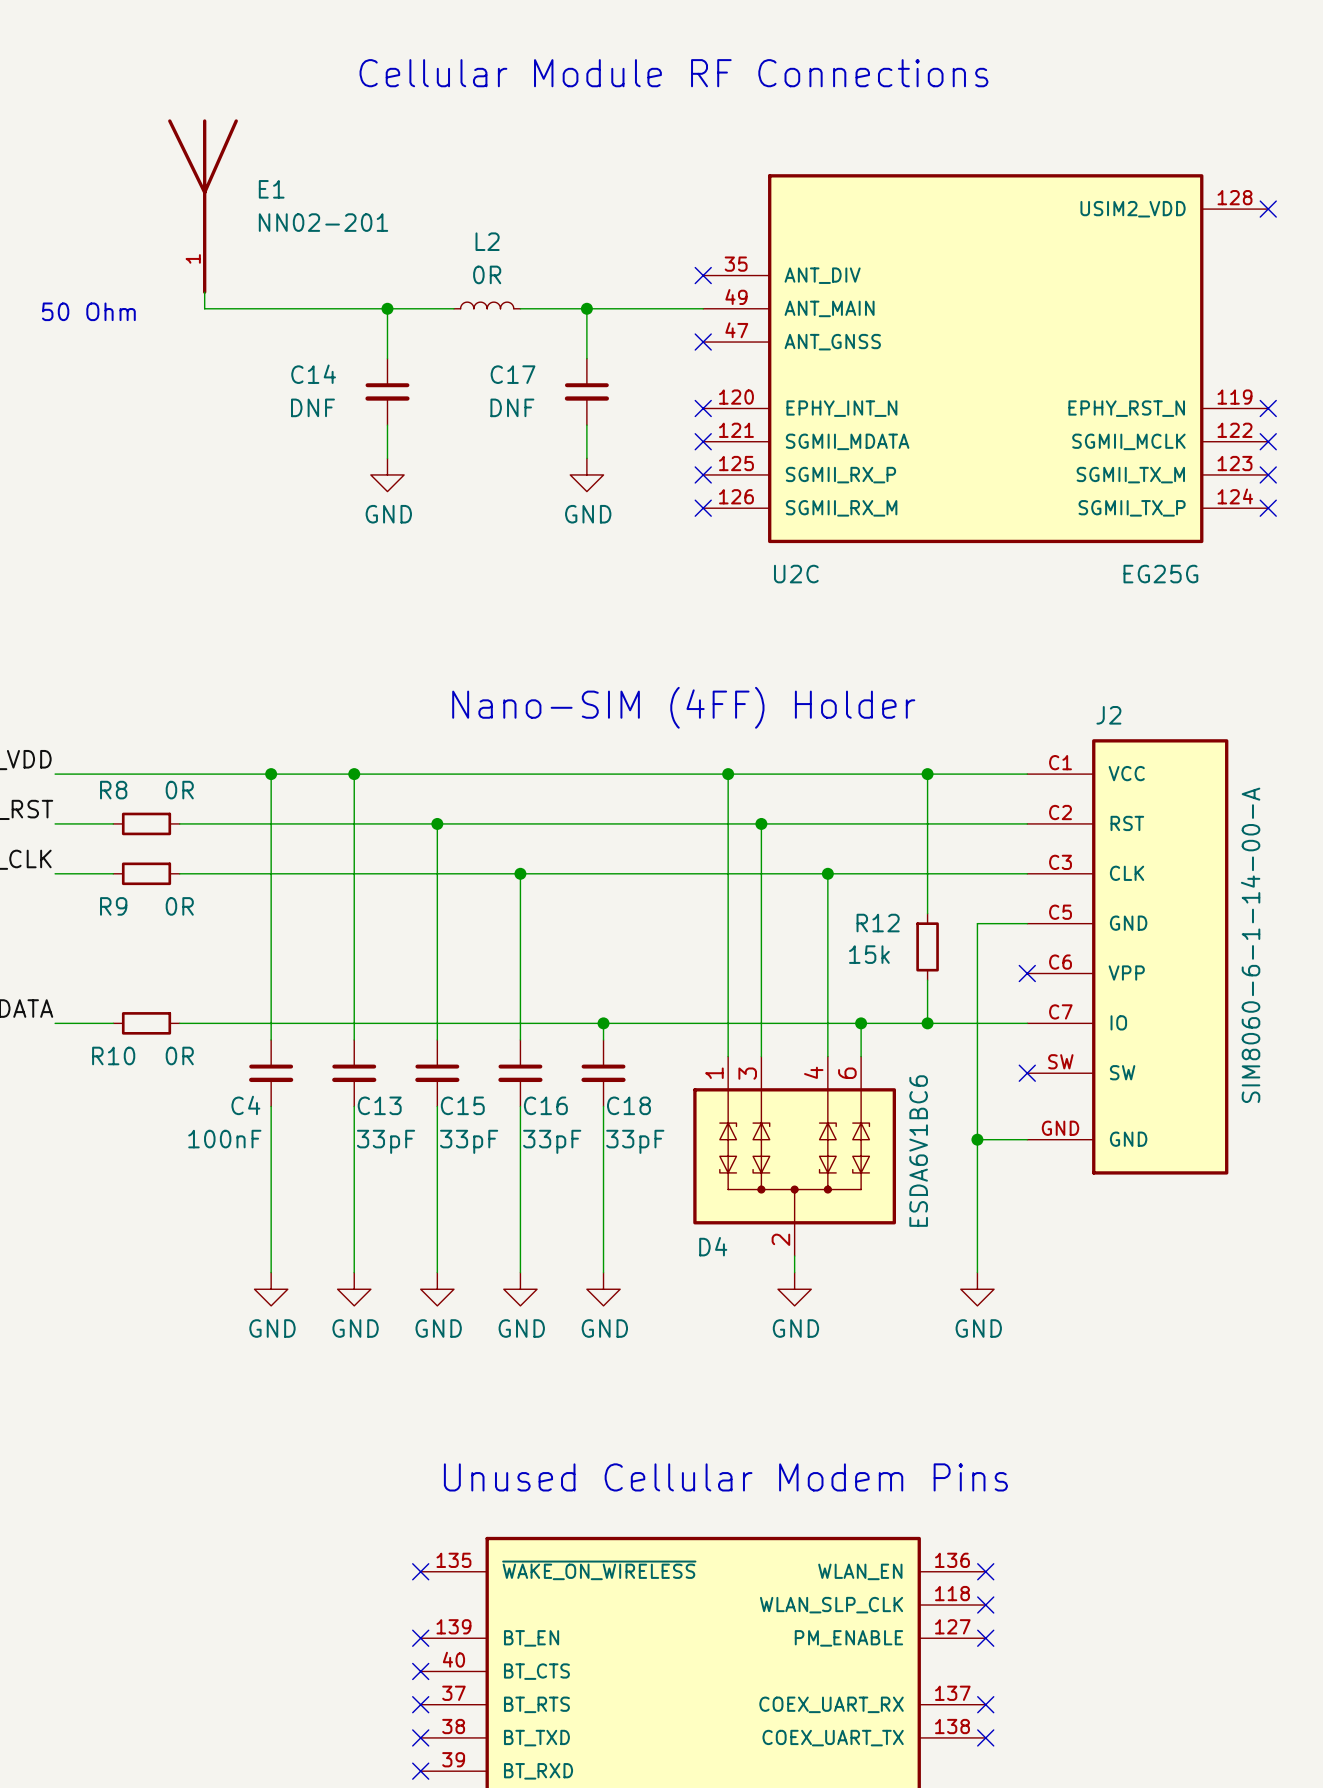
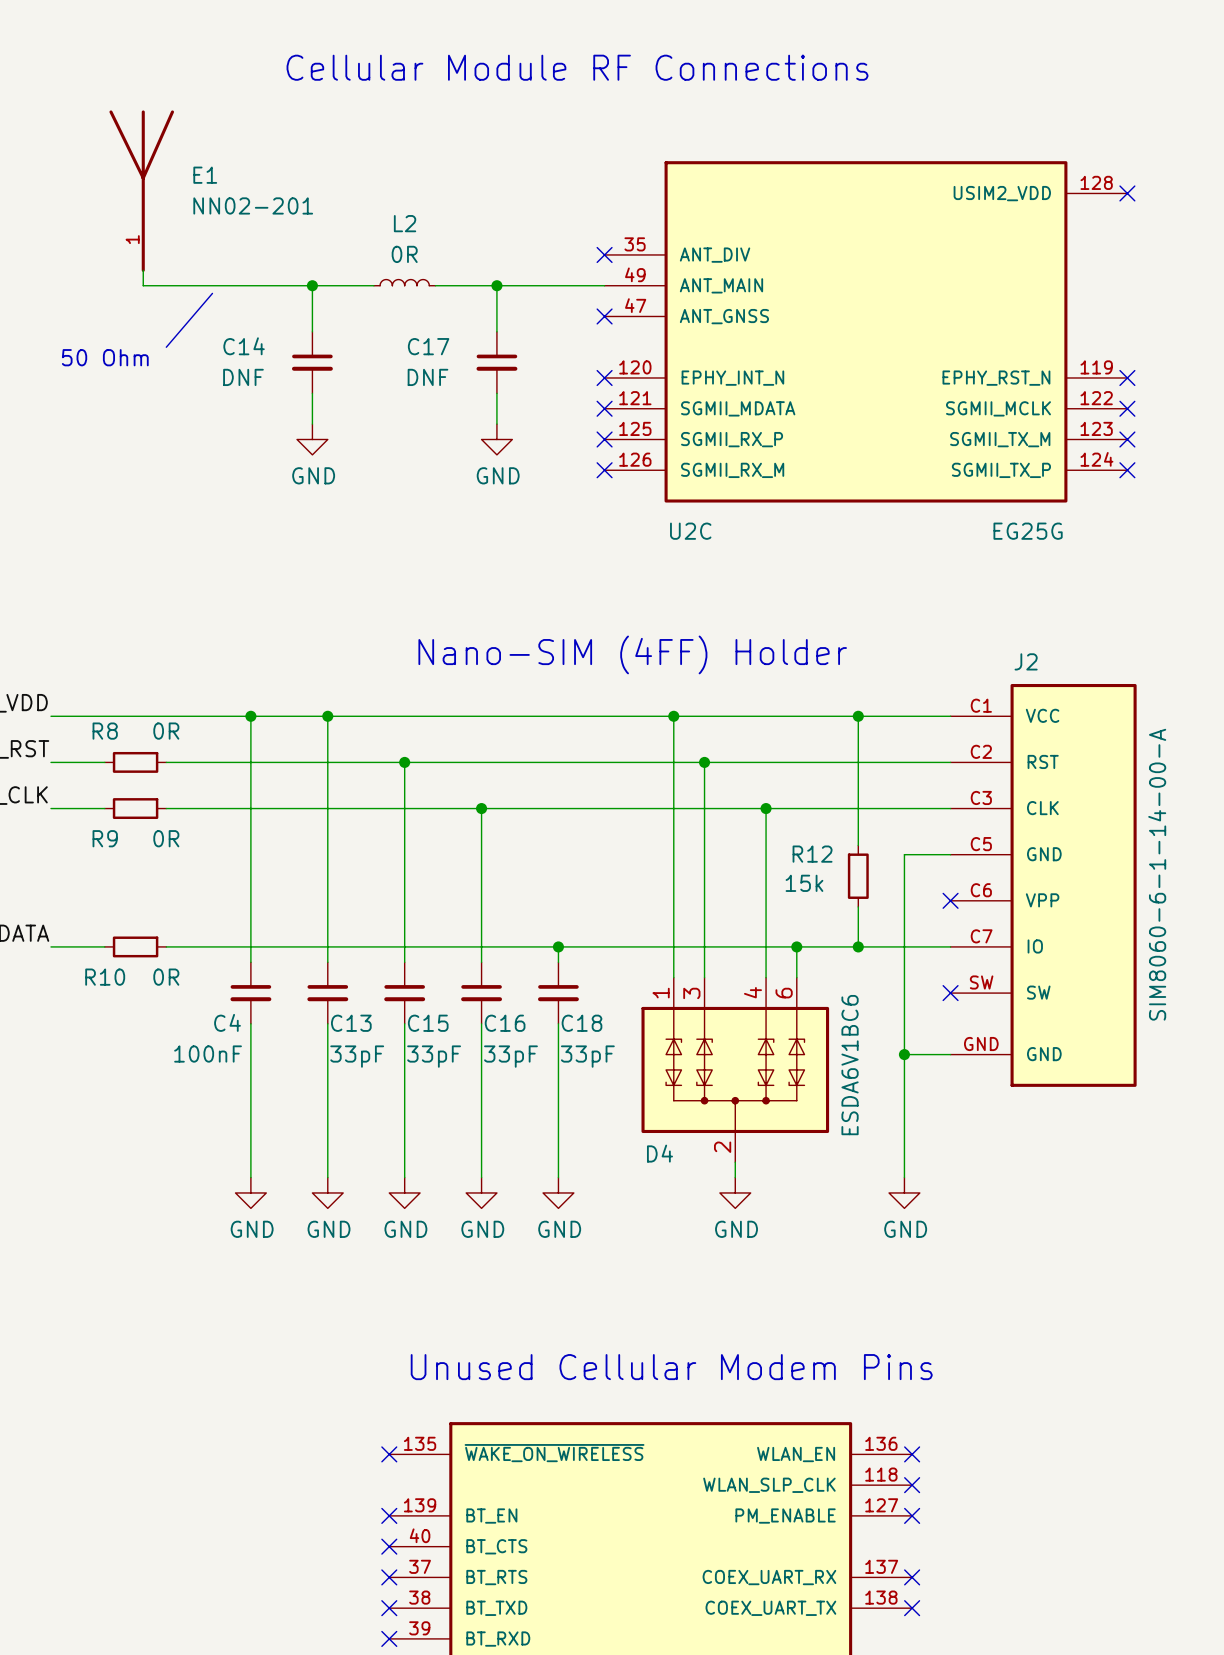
text position: Cellular Module RF Connections (673, 73) -> Cellular Module RF Connections (577, 67)
E1 position: (203, 206) -> (141, 191)
no-connect mark position: (1268, 209) -> (1127, 193)
no-connect mark: none -> (604, 254)
no-connect mark: (703, 275) -> none
wire: (204, 292) (204, 308) -> (143, 270) (143, 285) (189, 285)
L2 position: (487, 305) -> (404, 282)
wire: (387, 308) (387, 358) -> (312, 285) (312, 331)
junction position: (387, 308) -> (312, 285)
wire: (404, 308) (453, 308) -> (435, 285) (481, 285)
wire: (586, 308) (586, 358) -> (496, 285) (496, 331)
junction position: (586, 308) -> (496, 285)
text position: 50 Ohm (88, 311) -> 50 Ohm (105, 357)
line: none -> (212, 293) (166, 347)
no-connect mark: none -> (604, 316)
no-connect mark: (703, 342) -> none
U2C position: (985, 358) -> (865, 331)
C14 position: (387, 391) -> (312, 362)
C17 position: (586, 391) -> (496, 362)
no-connect mark: none -> (604, 377)
no-connect mark: (703, 408) -> none
no-connect mark: none -> (1127, 377)
no-connect mark: (1268, 408) -> none
wire: (387, 425) (387, 458) -> (312, 393) (312, 424)
wire: (586, 425) (586, 458) -> (496, 393) (496, 424)
no-connect mark: none -> (604, 408)
no-connect mark: (703, 441) -> none
no-connect mark: none -> (1127, 408)
no-connect mark: (1268, 441) -> none
power symbol position: GND (387, 474) -> GND (312, 439)
power symbol position: GND (586, 474) -> GND (496, 439)
no-connect mark: none -> (604, 439)
no-connect mark: (703, 474) -> none
no-connect mark: none -> (1127, 439)
no-connect mark: (1268, 474) -> none
no-connect mark: none -> (604, 470)
no-connect mark: (703, 508) -> none
no-connect mark: none -> (1127, 470)
no-connect mark: (1268, 508) -> none

